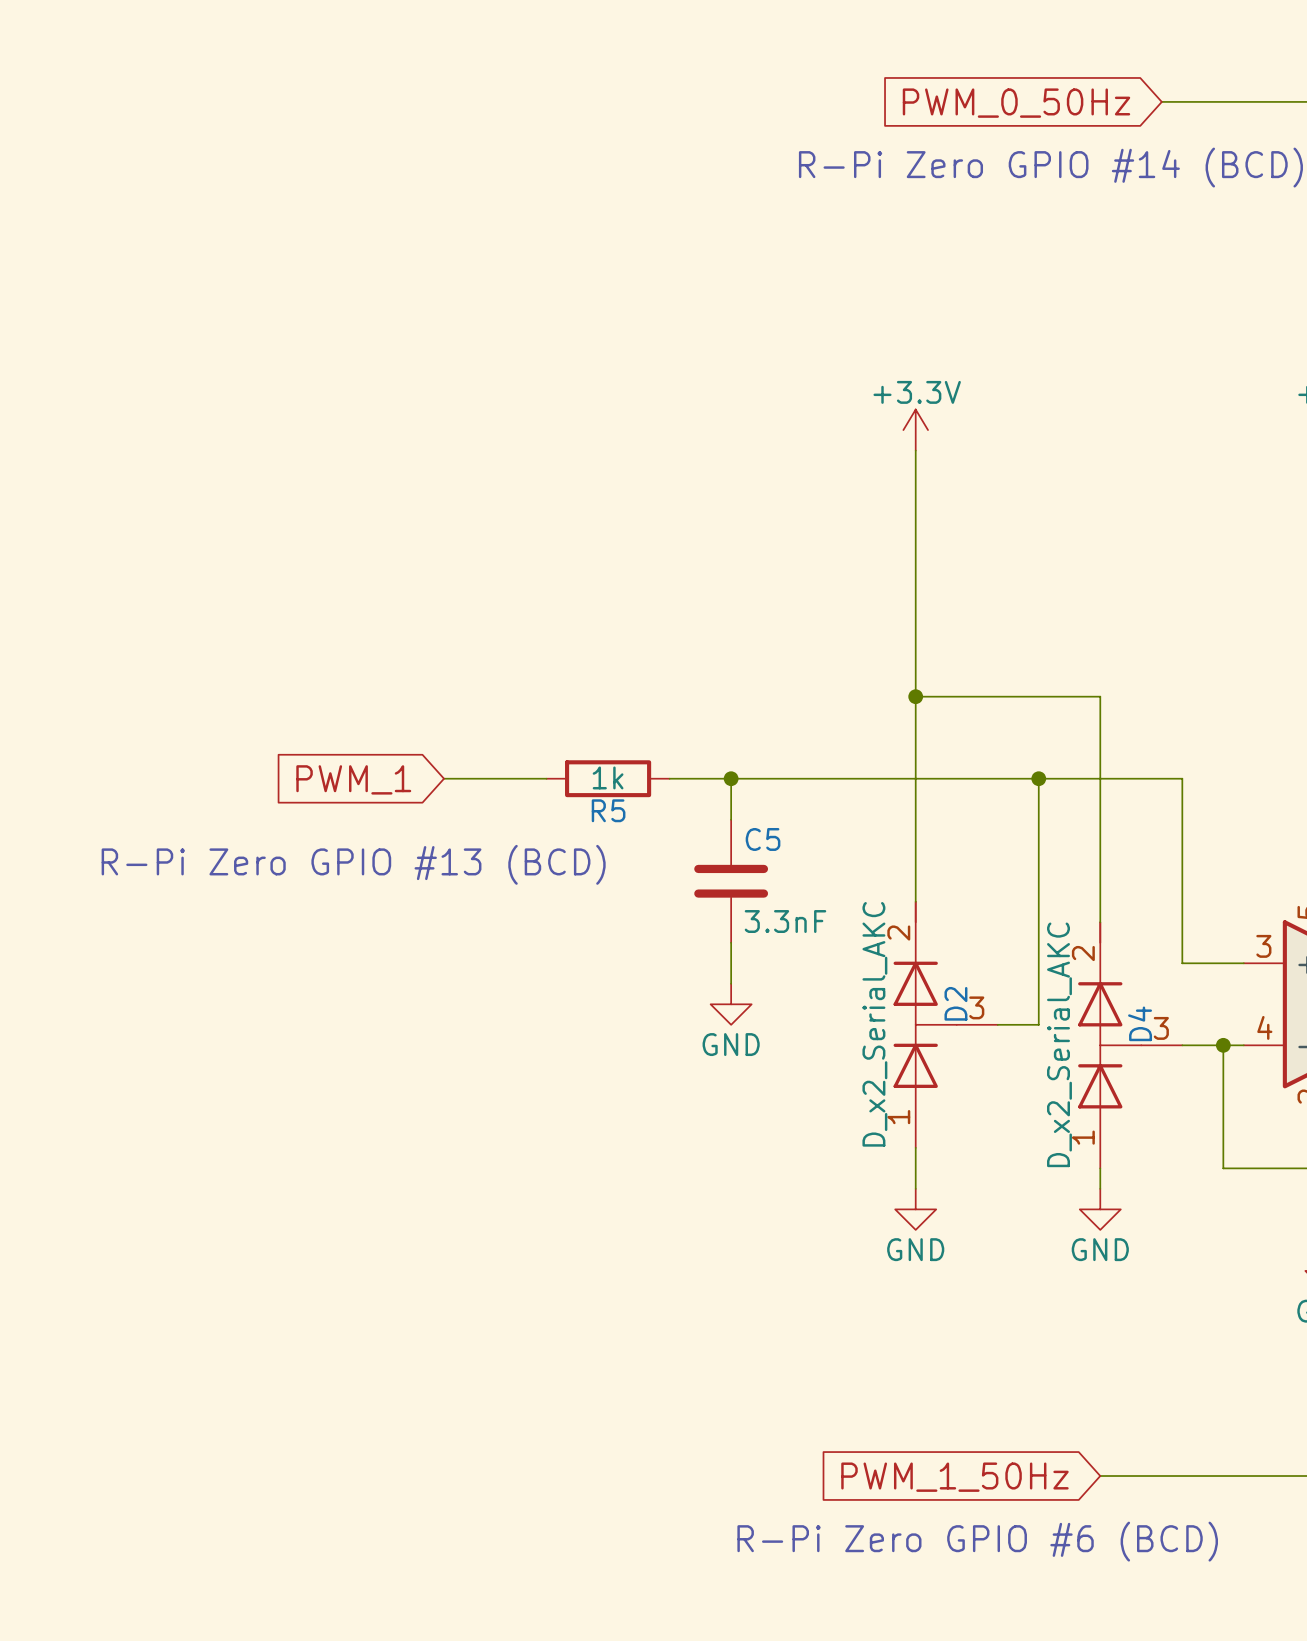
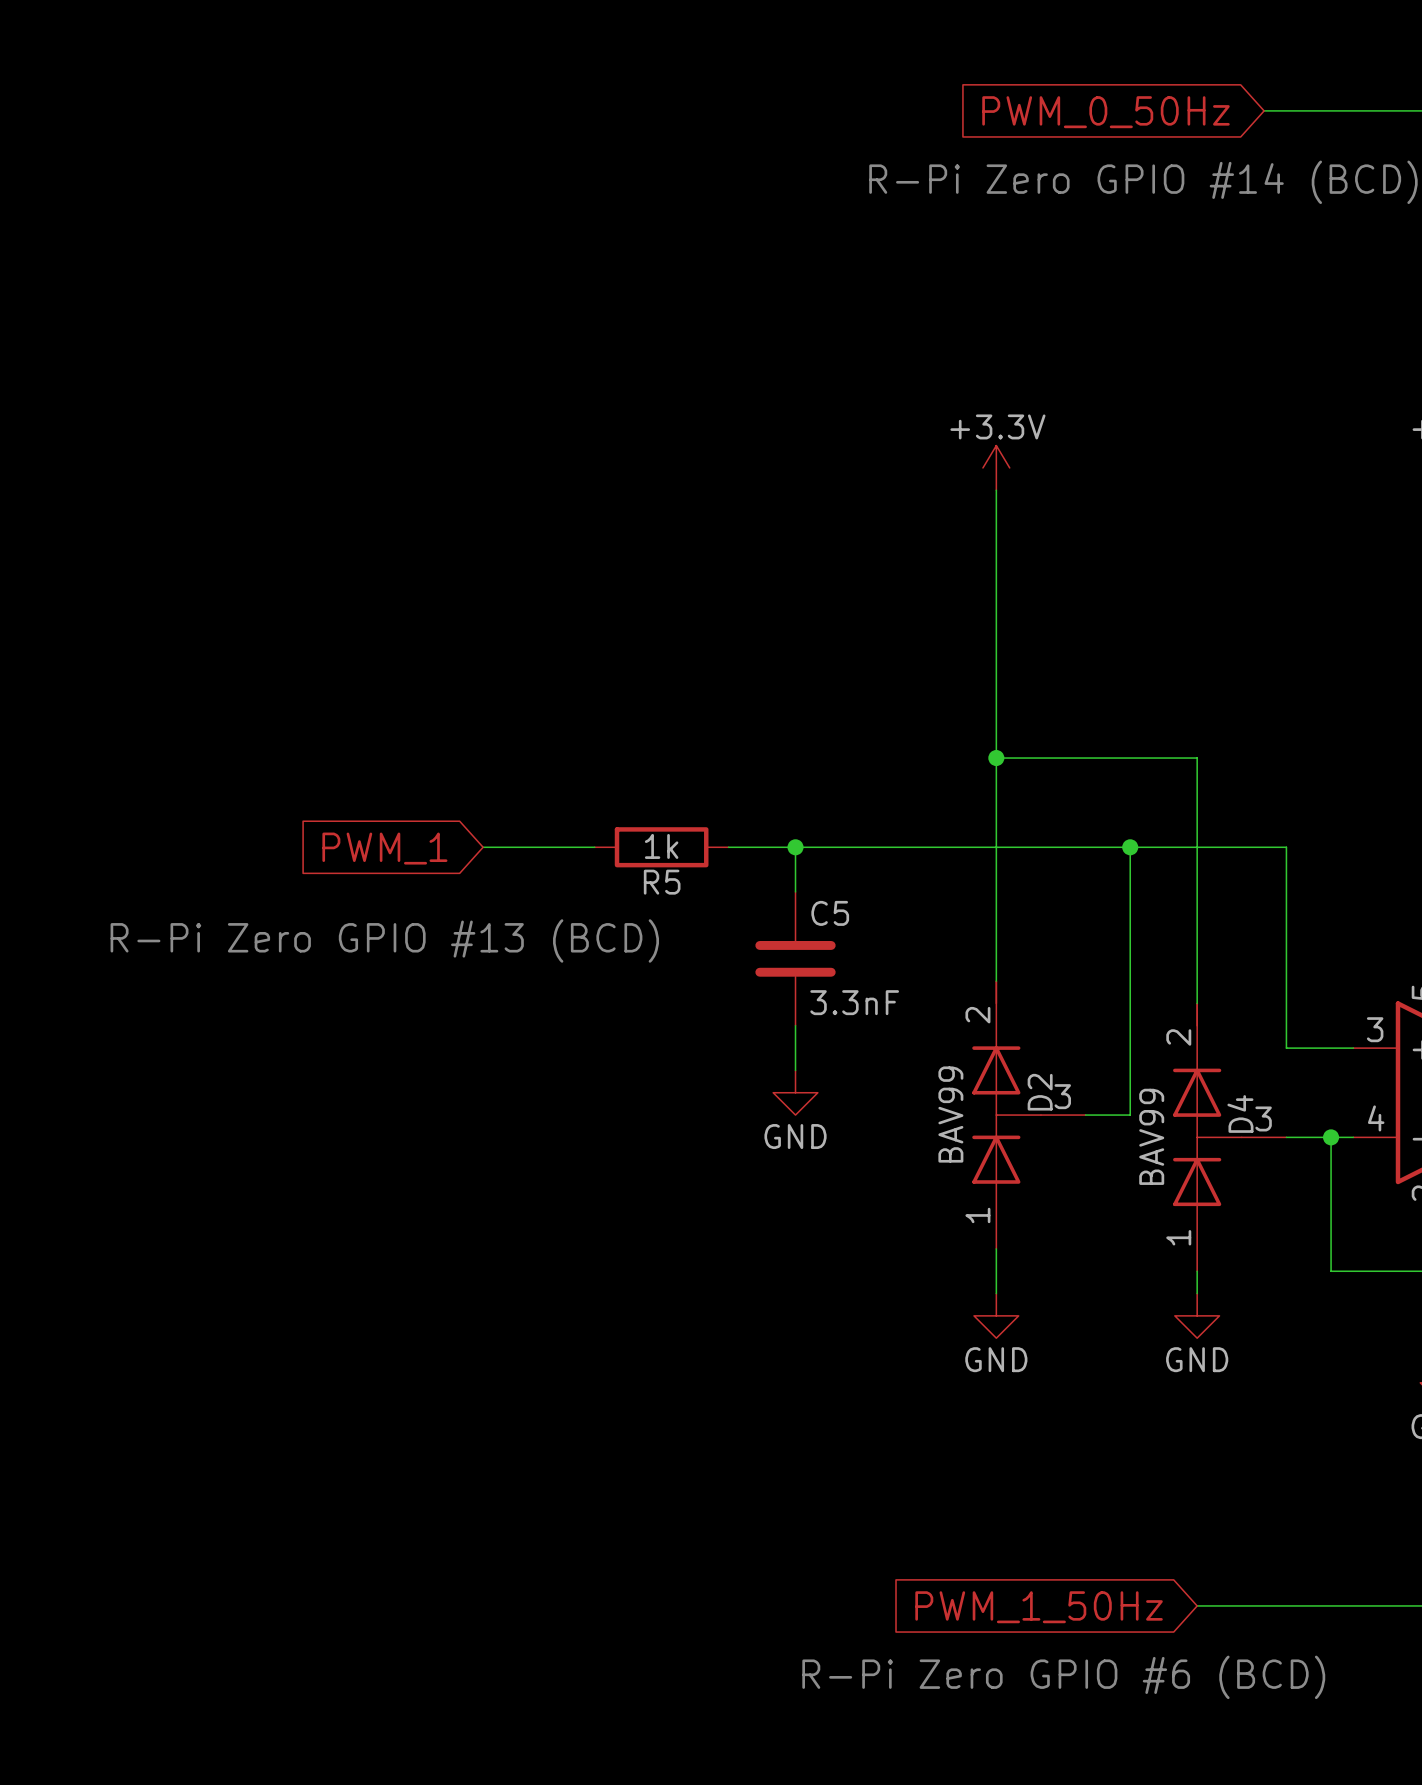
D2 value: D_x2_Serial_AKC (874, 1024) -> BAV99 (950, 1114)
D4 value: D_x2_Serial_AKC (1059, 1044) -> BAV99 (1151, 1136)

